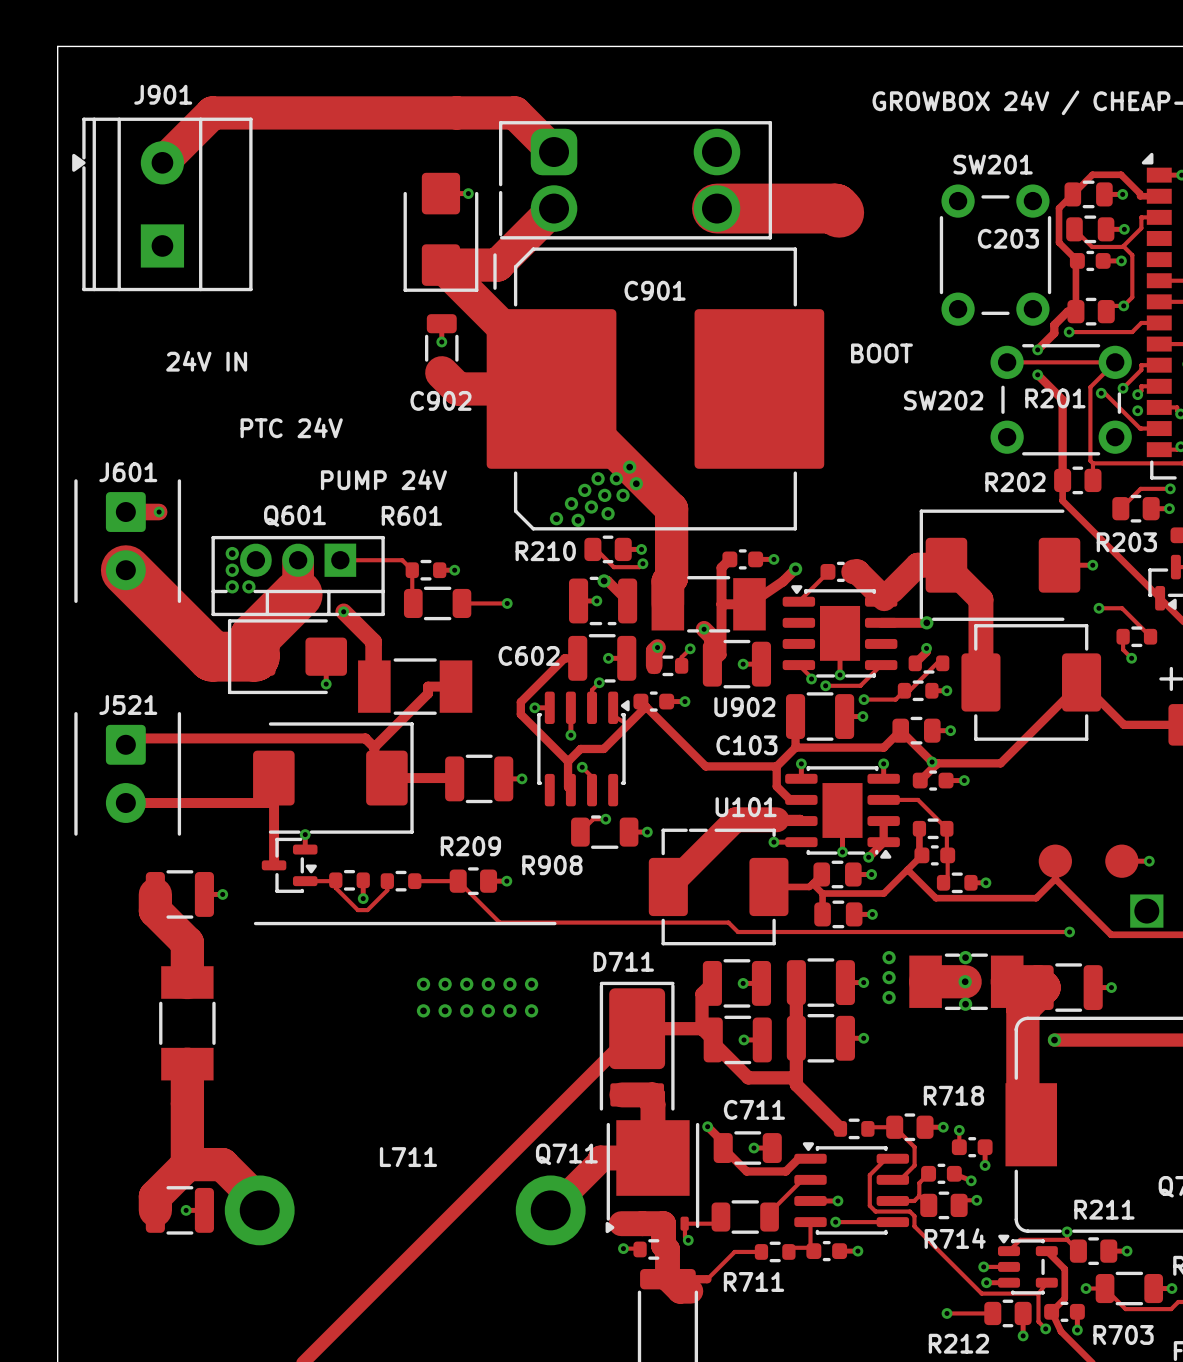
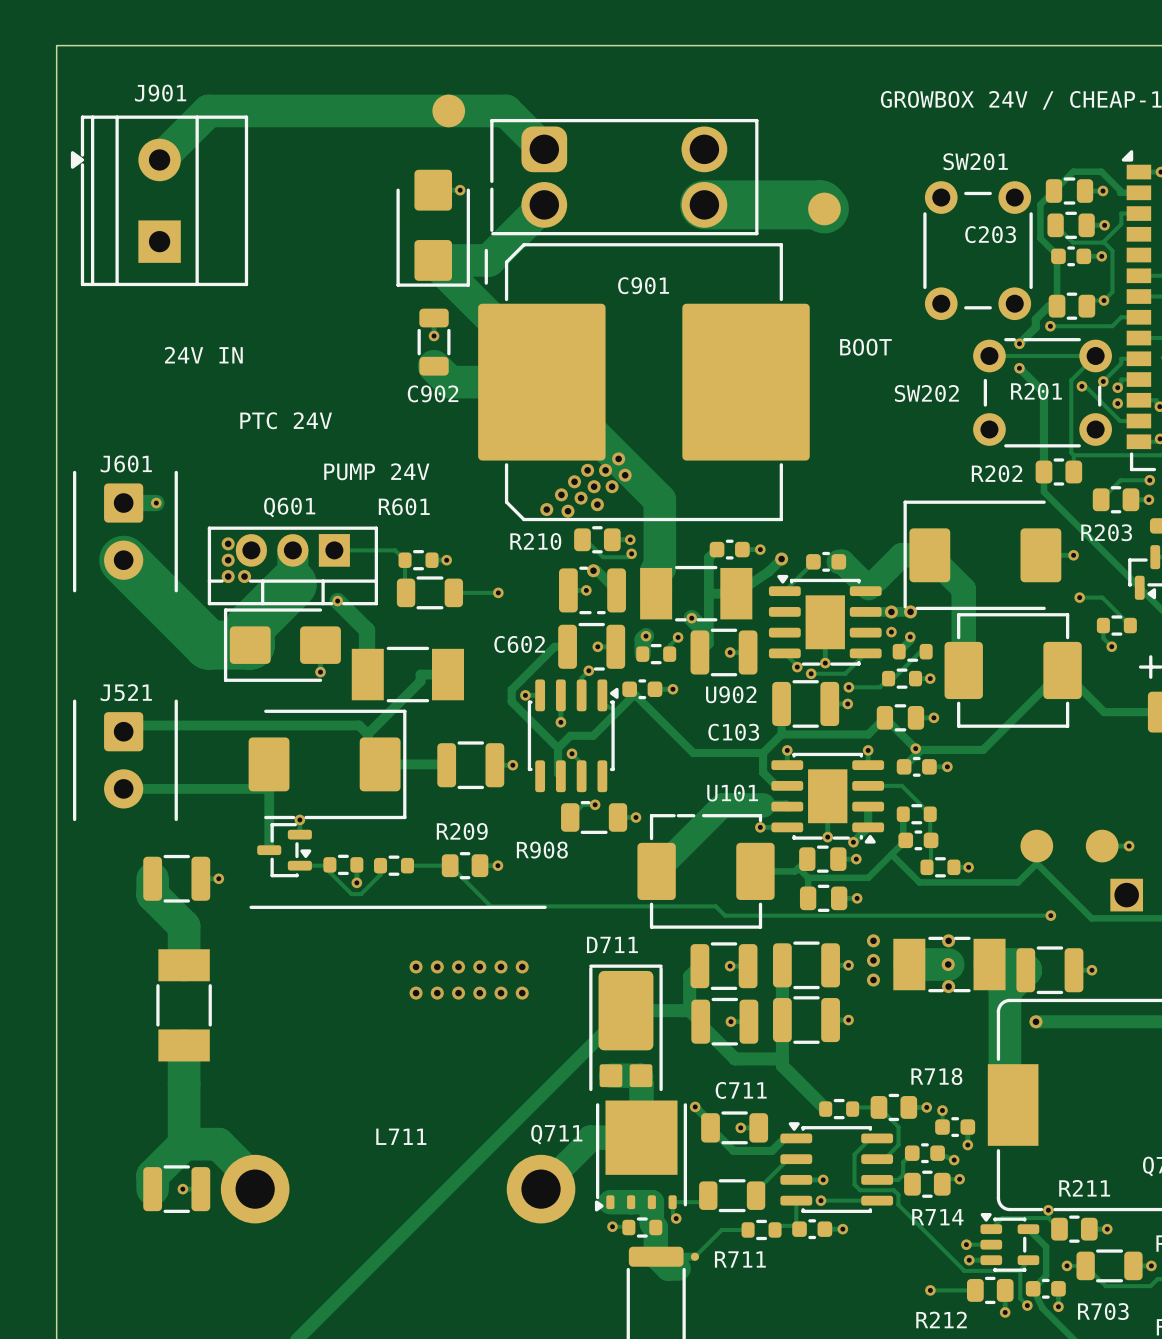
via: none -> (891, 611)
via: none -> (891, 632)

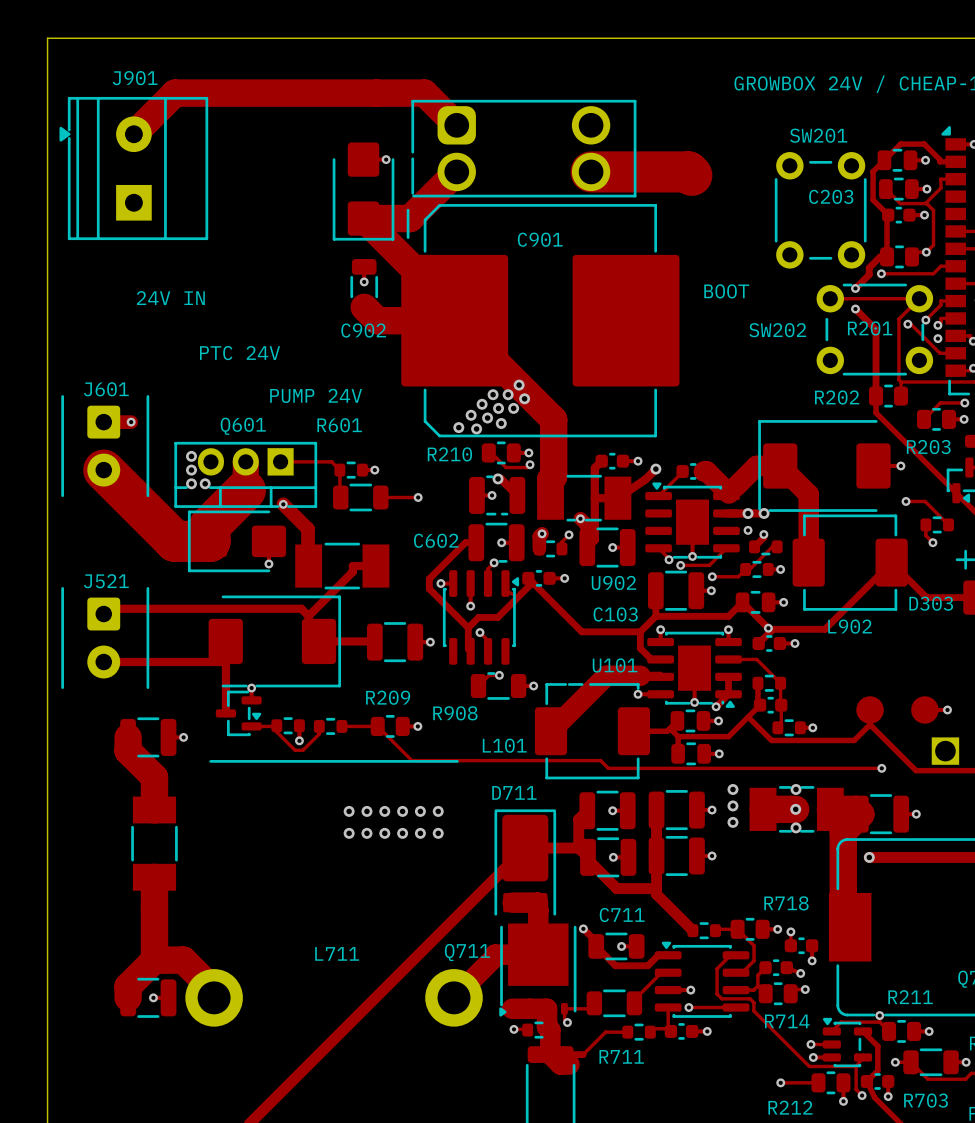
D303 name: none -> D303 (931, 603)
L902 name: none -> L902 (850, 626)
L101 name: none -> L101 (504, 745)

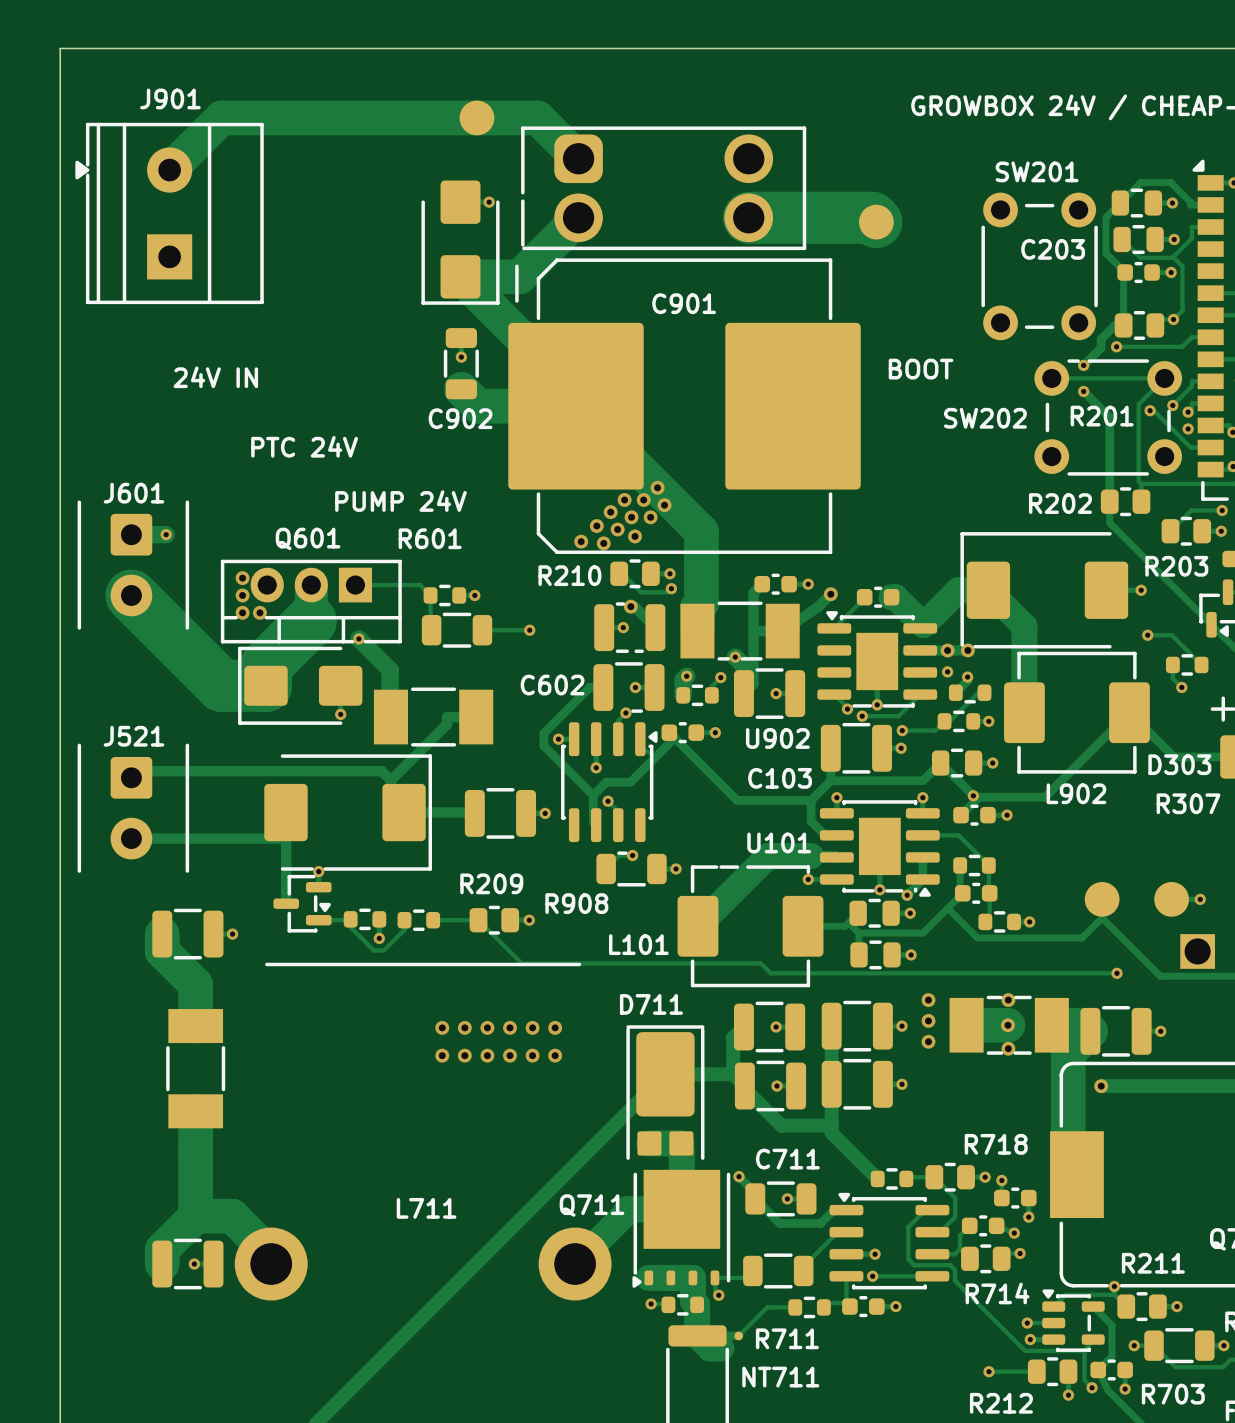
R307 name: none -> R307 (1188, 803)
NT711 name: none -> NT711 (780, 1377)

